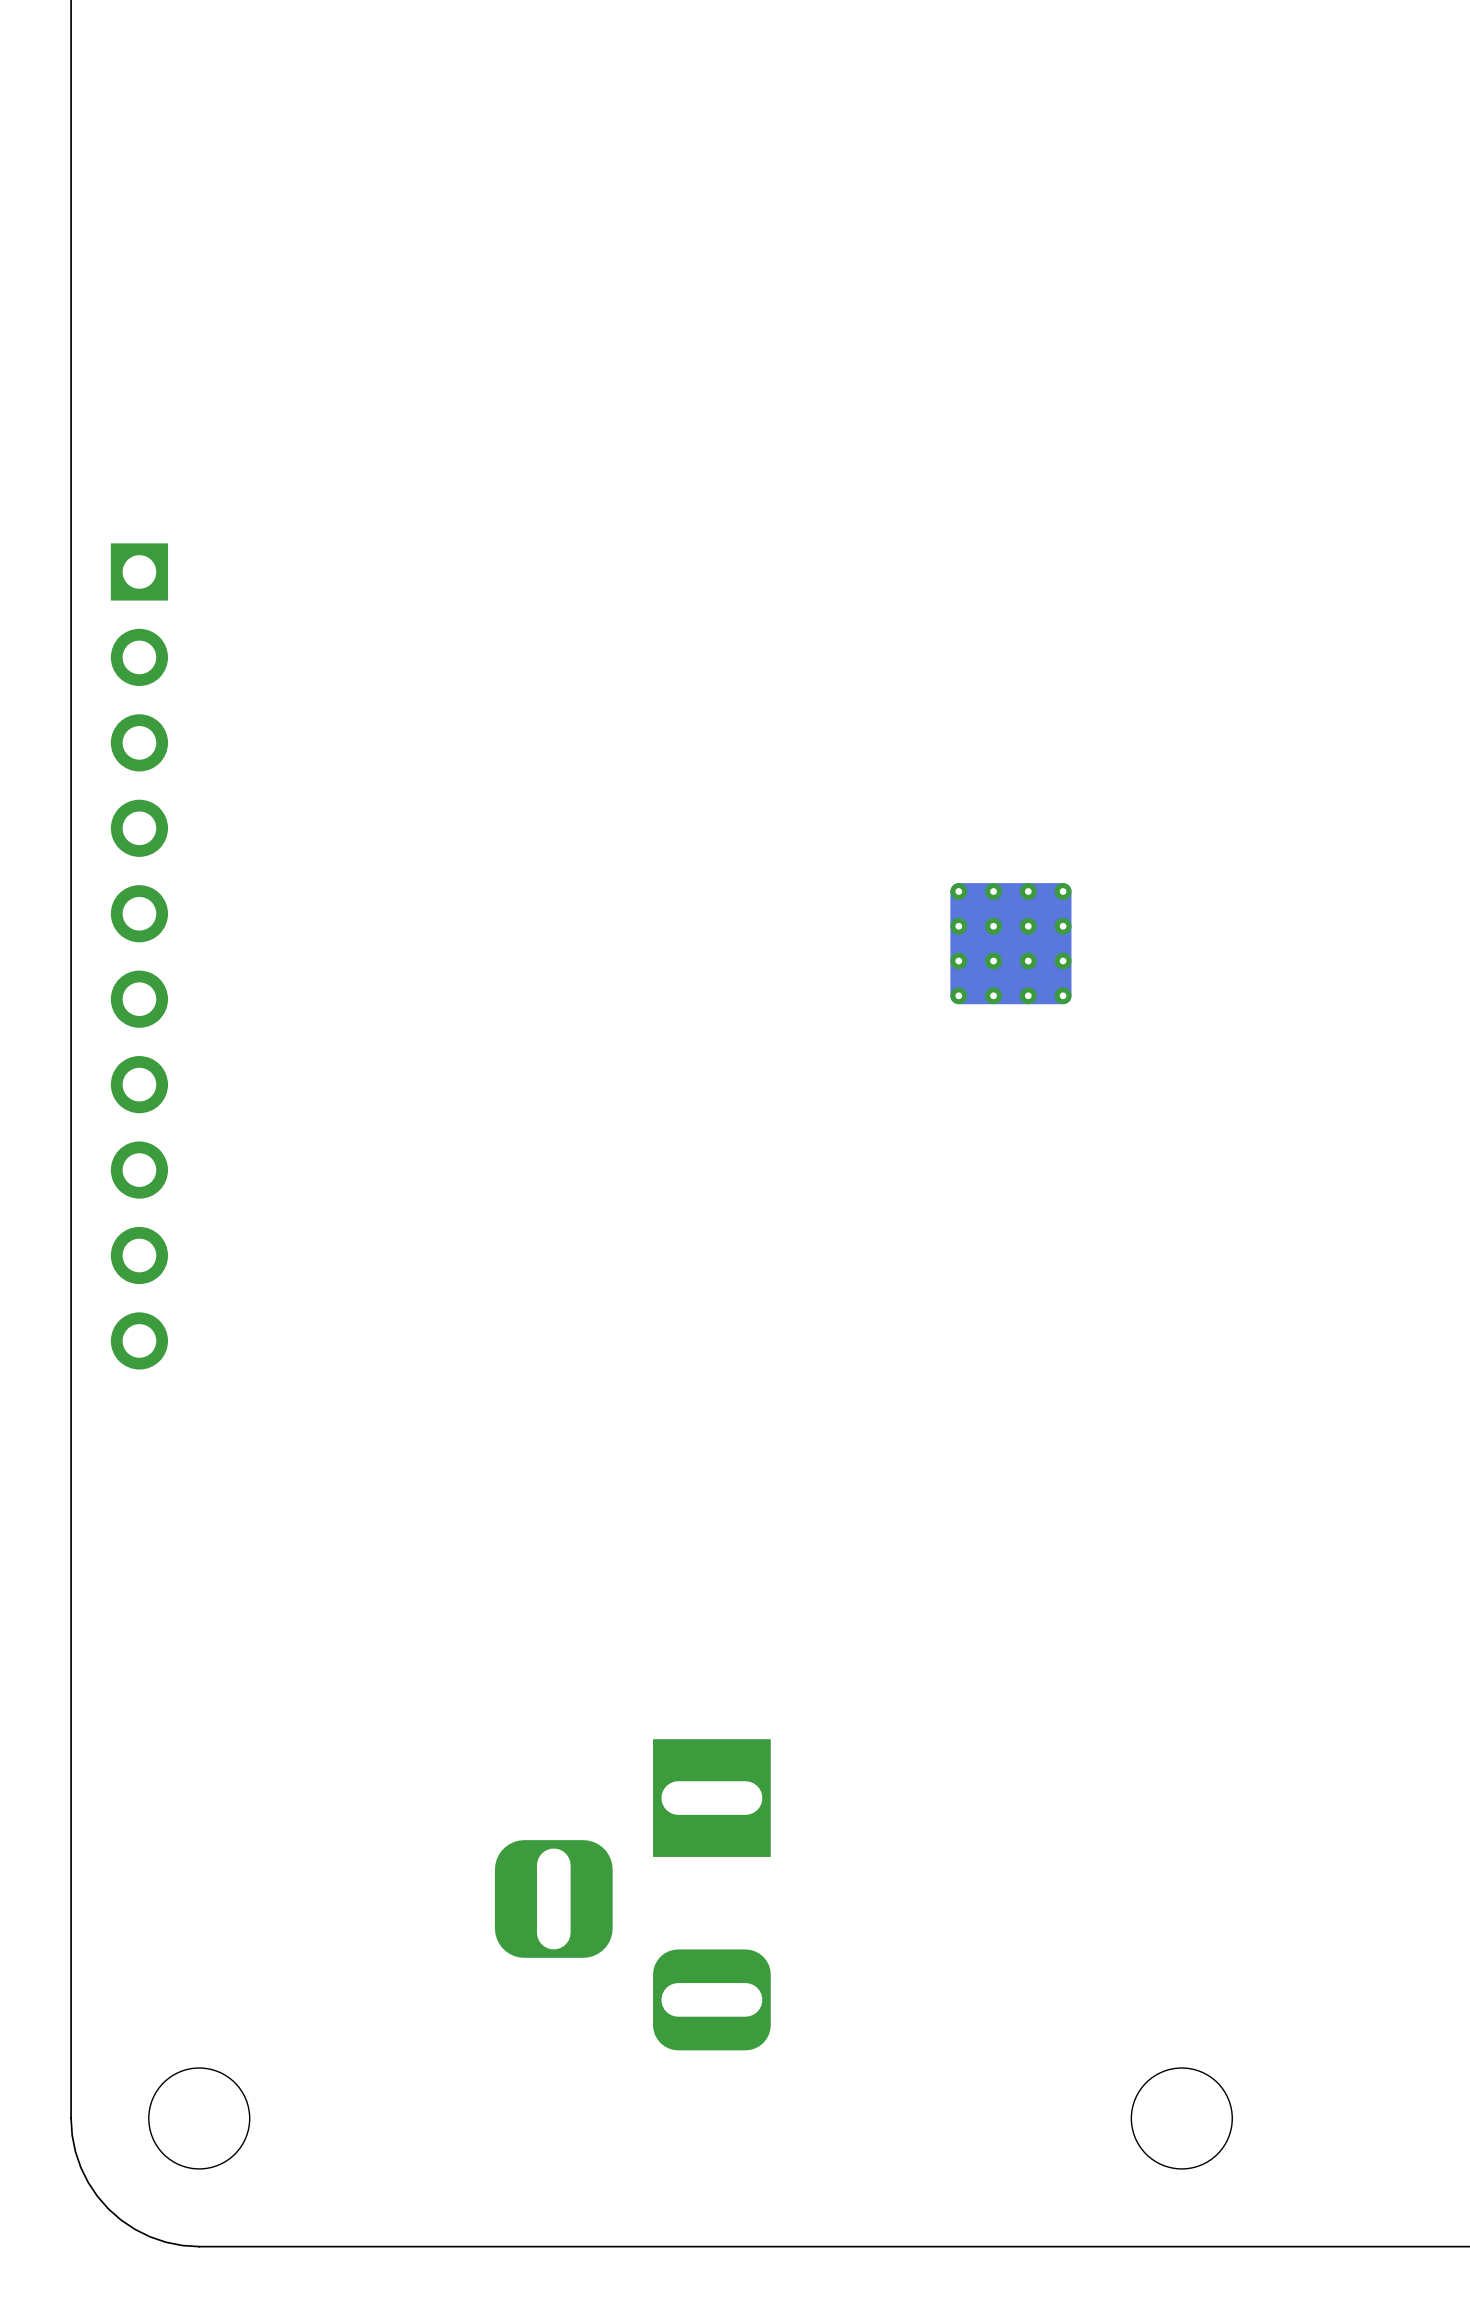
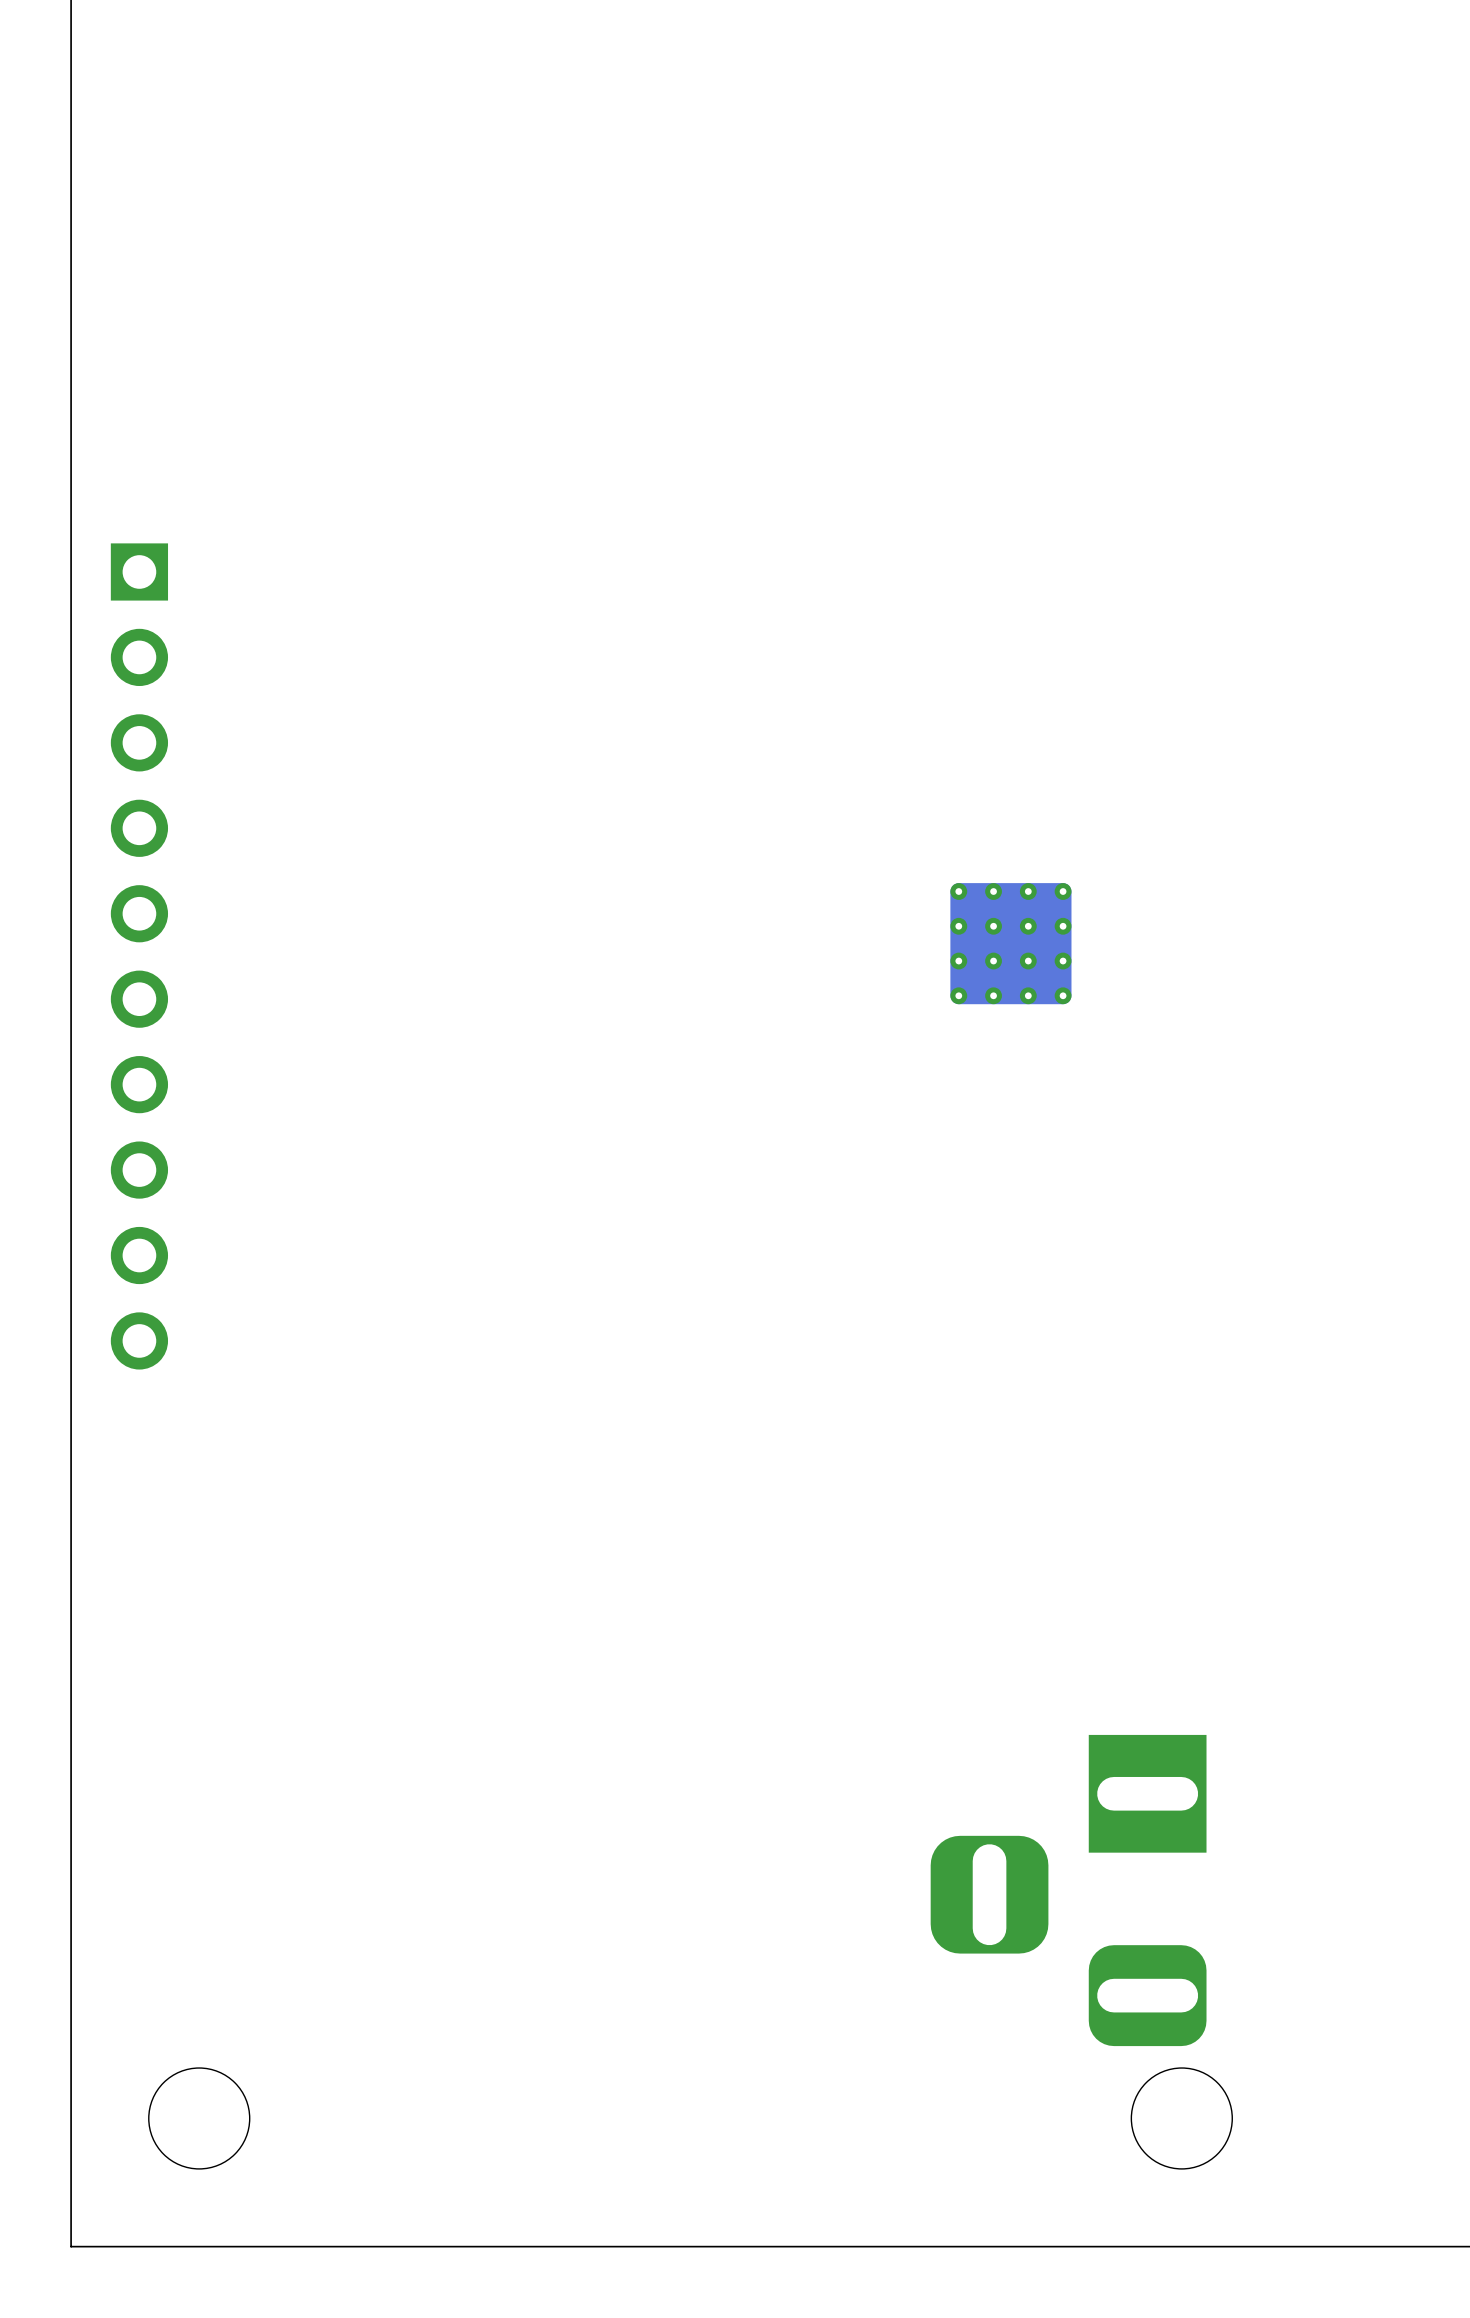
part position: (632, 1894) -> (1068, 1890)
board edge: (71, 2118) (72, 2135) (80, 2167) (88, 2182) (108, 2209) (135, 2229) (150, 2236) (182, 2245) (199, 2246) -> (71, 2118) (71, 2246) (199, 2246)

